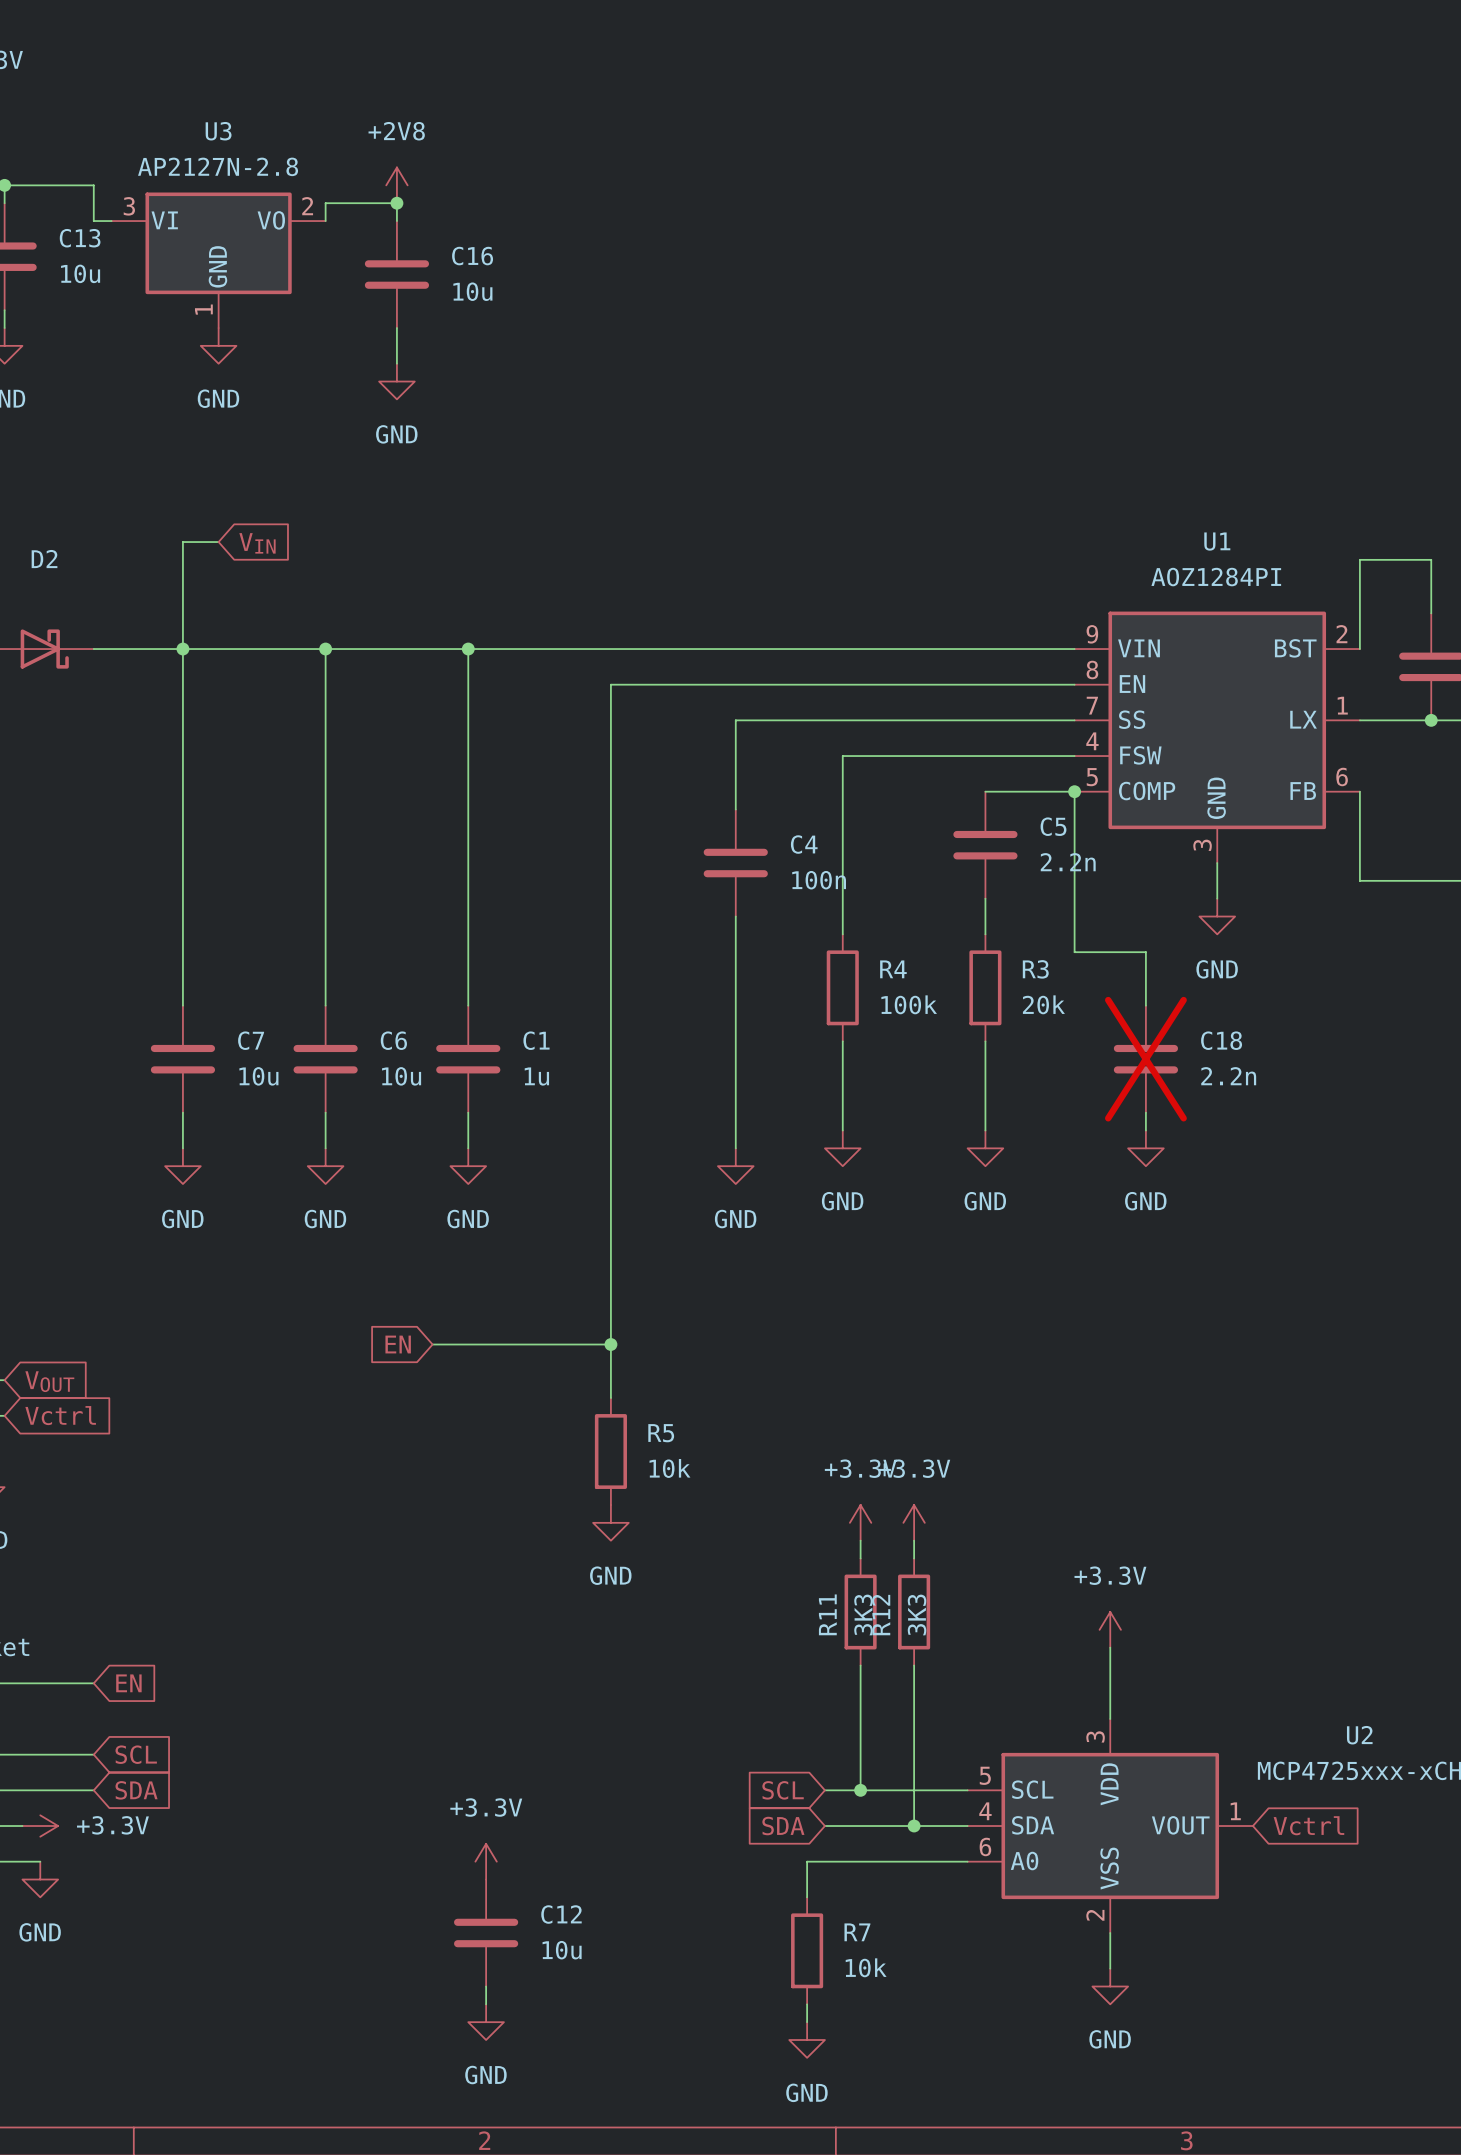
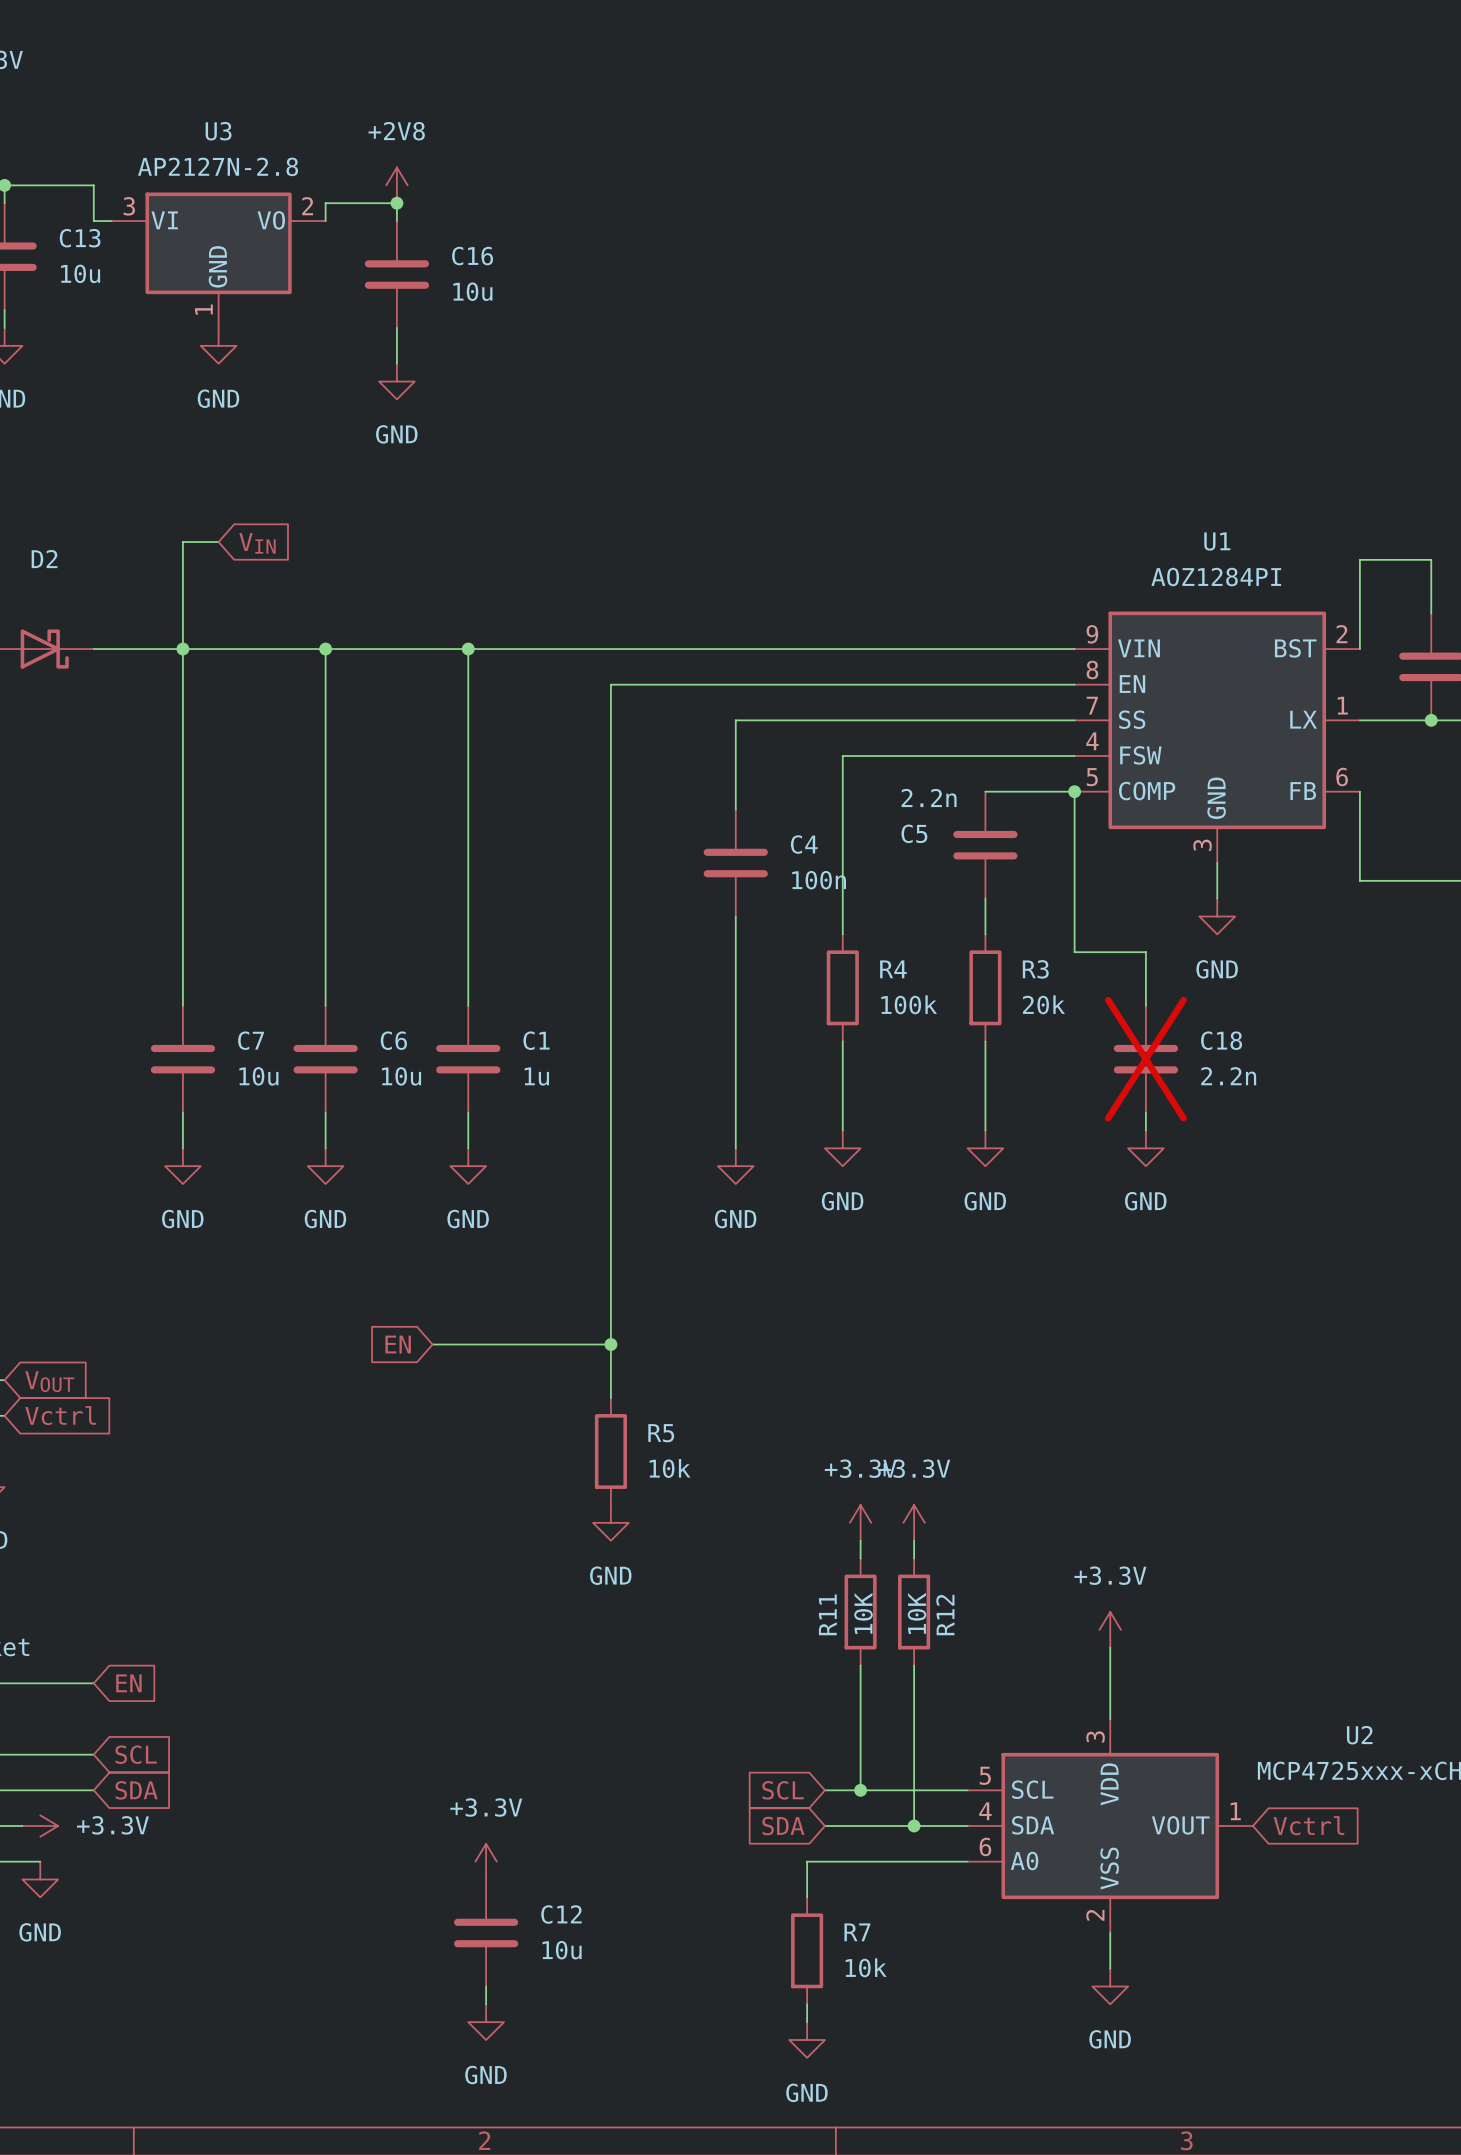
C5 name position: C5 (1053, 826) -> C5 (914, 833)
C5 value position: 2.2n (1068, 862) -> 2.2n (929, 797)
R11 value: 3K3 (863, 1614) -> 10K (863, 1613)
R12 value: 3K3 (917, 1614) -> 10K (917, 1613)
R12 name position: R12 (881, 1615) -> R12 (945, 1615)

